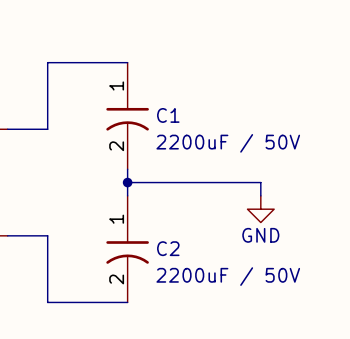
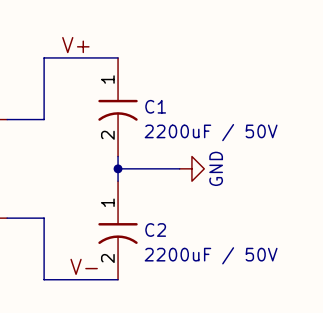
label: none -> V+ (75, 45)
wire: (194, 182) (260, 182) (260, 195) -> none
power symbol rotation: 0° (260, 209) -> 90° counterclockwise (191, 168)
power symbol position: GND (260, 209) -> GND (191, 168)
label: none -> V- (84, 266)

